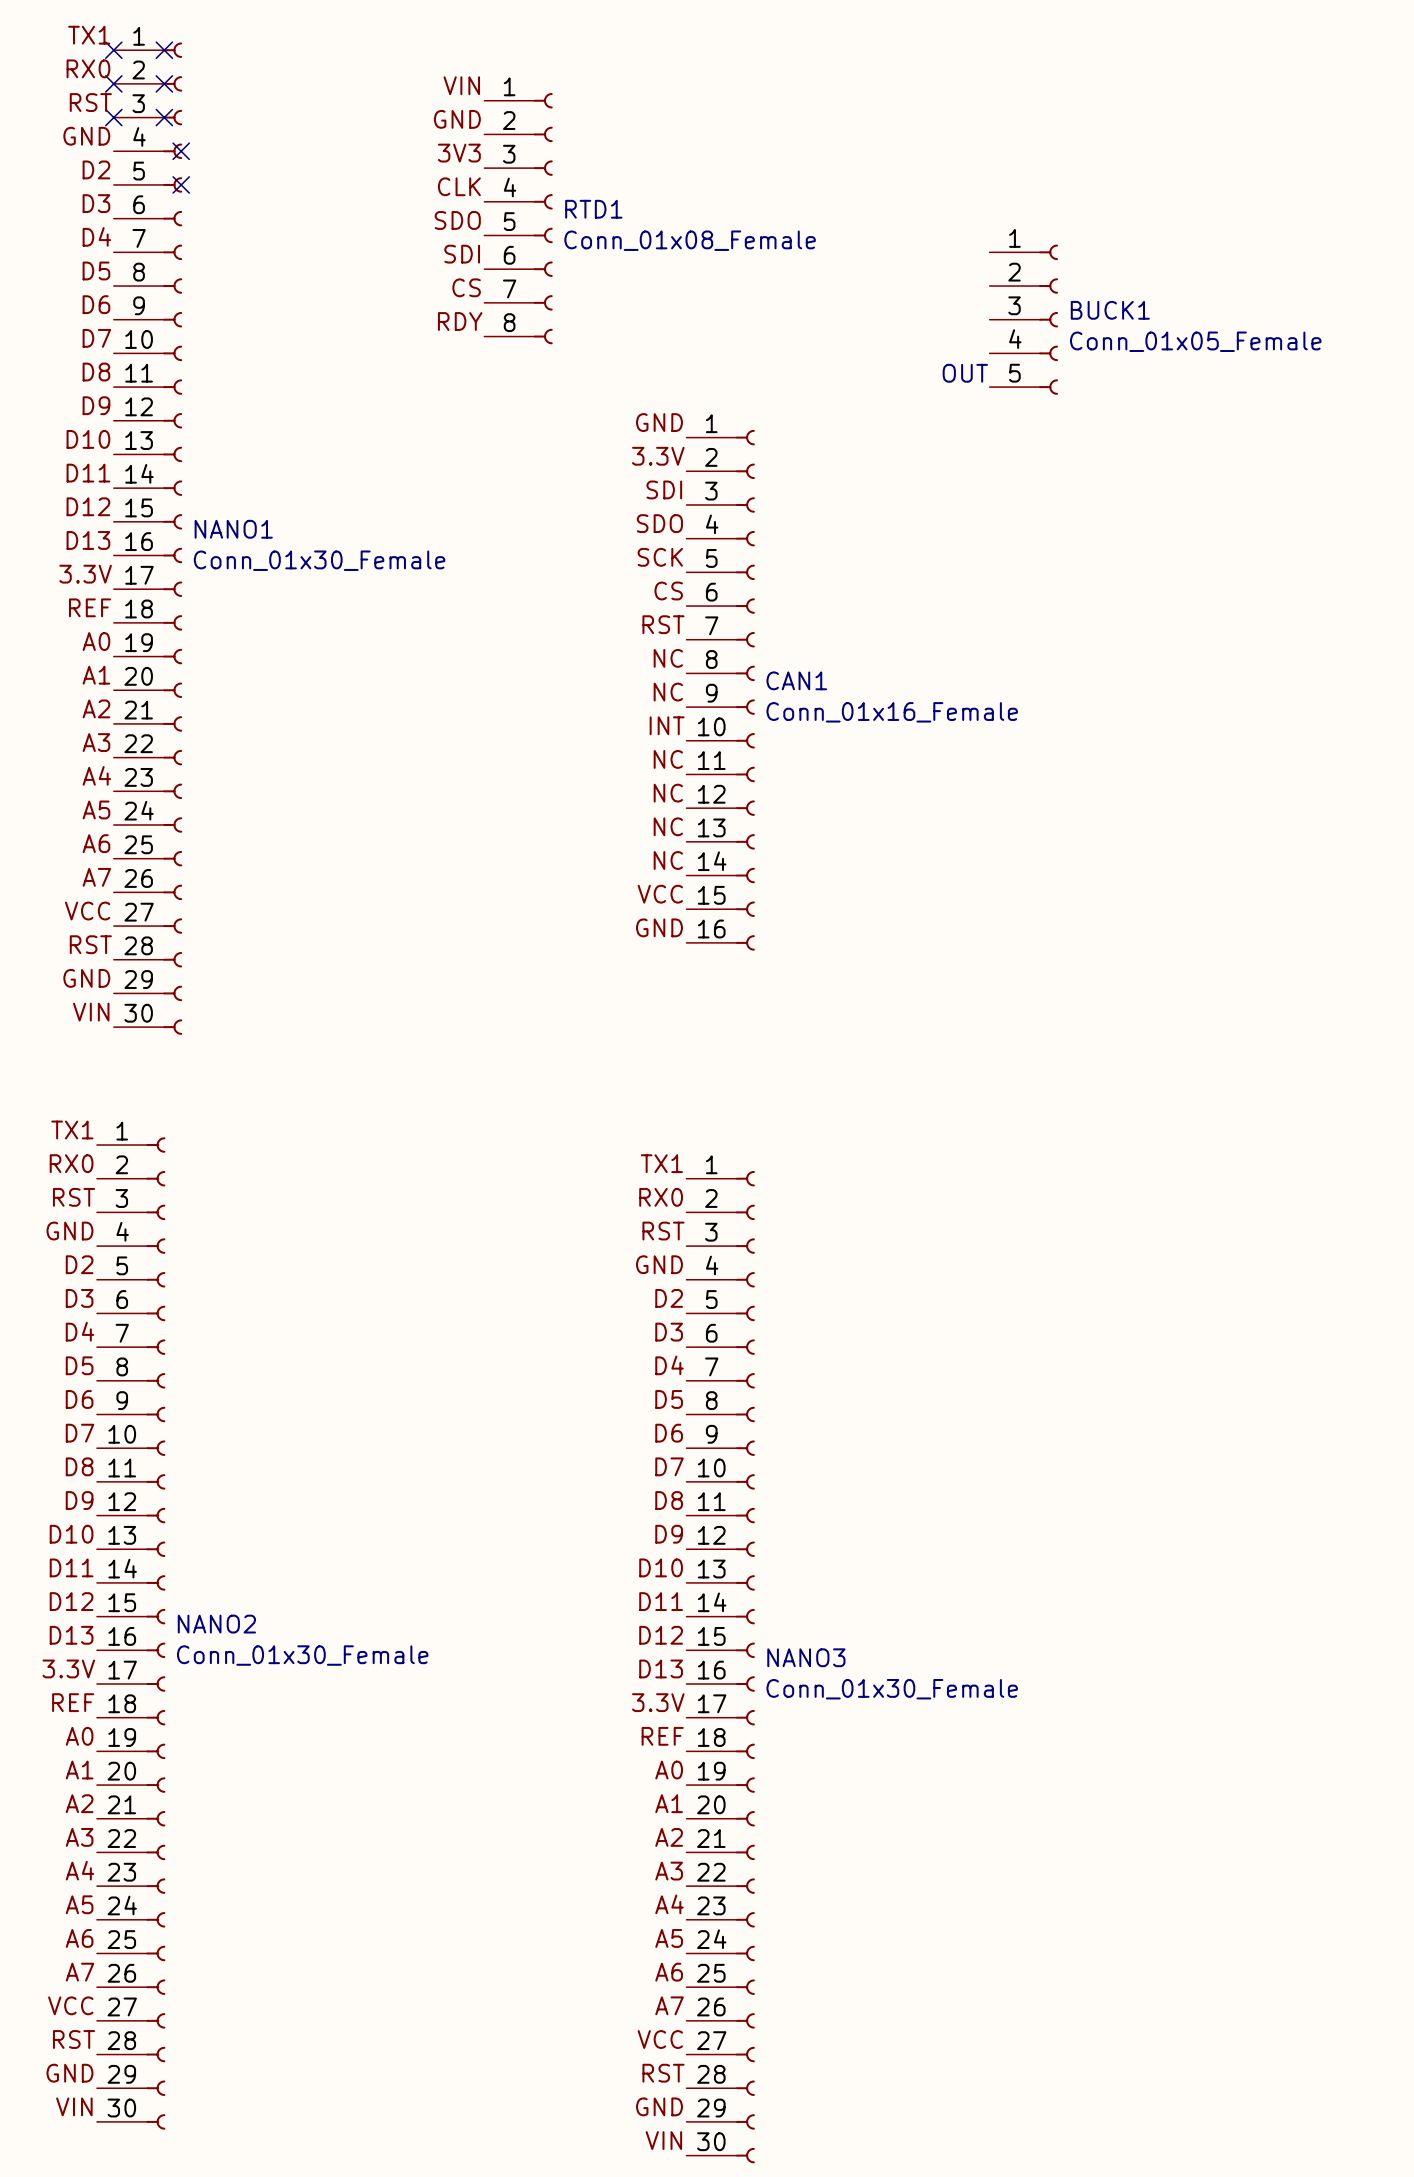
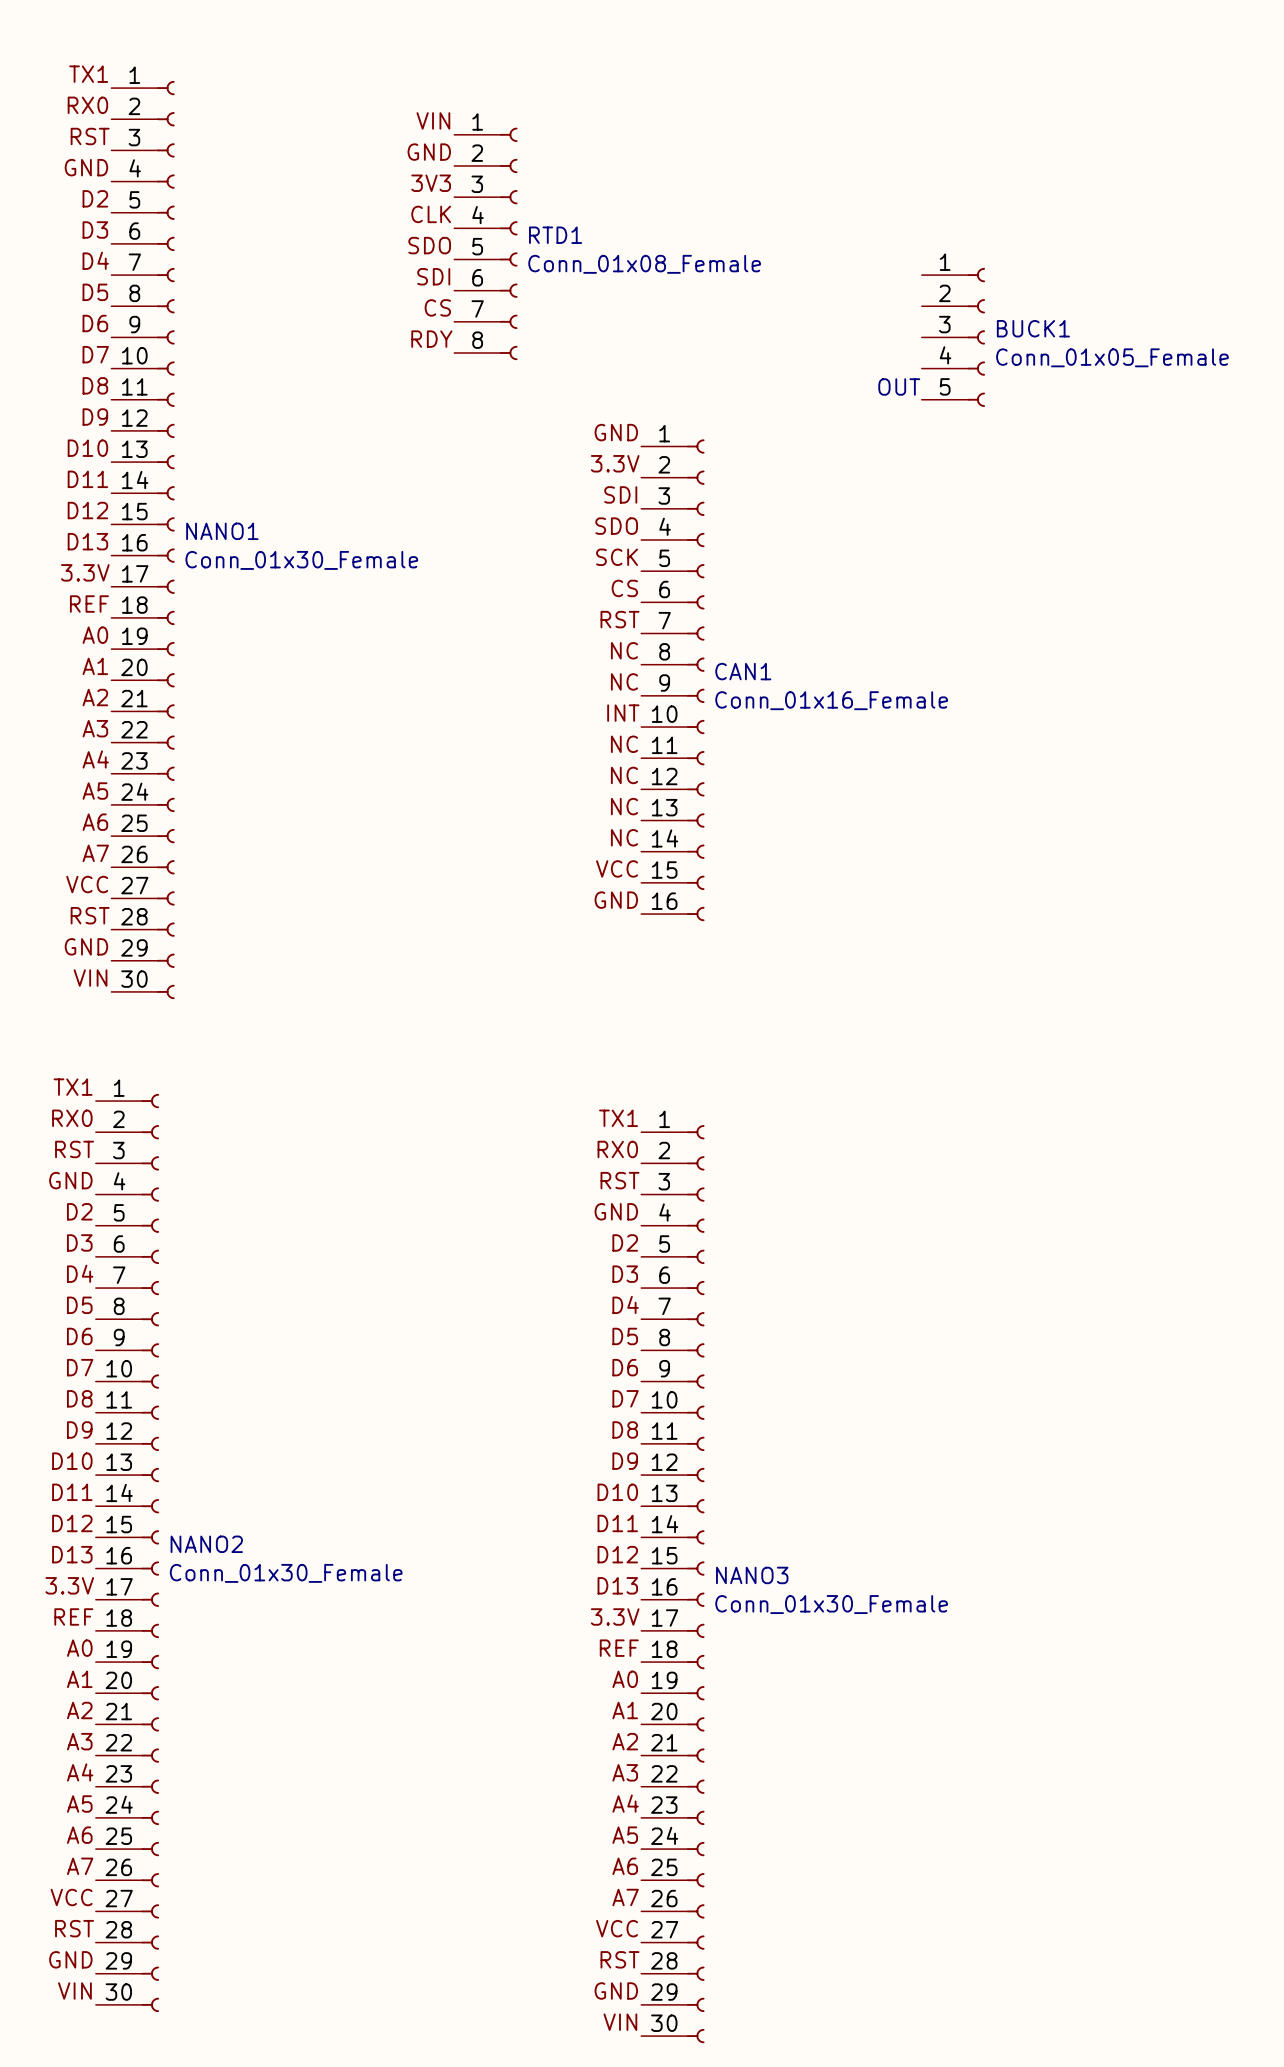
no-connect mark: (113, 50) -> none
no-connect mark: (164, 50) -> none
no-connect mark: (113, 83) -> none
no-connect mark: (164, 83) -> none
no-connect mark: (113, 117) -> none
no-connect mark: (164, 117) -> none
no-connect mark: (181, 151) -> none
no-connect mark: (181, 184) -> none

